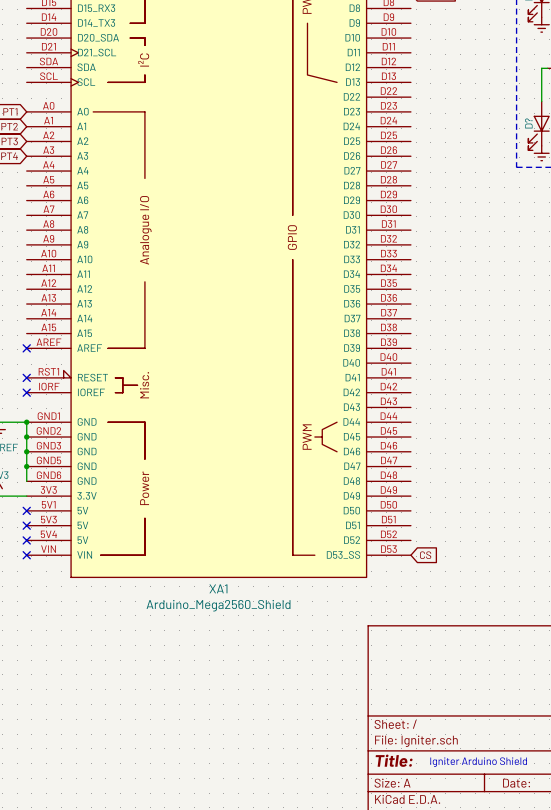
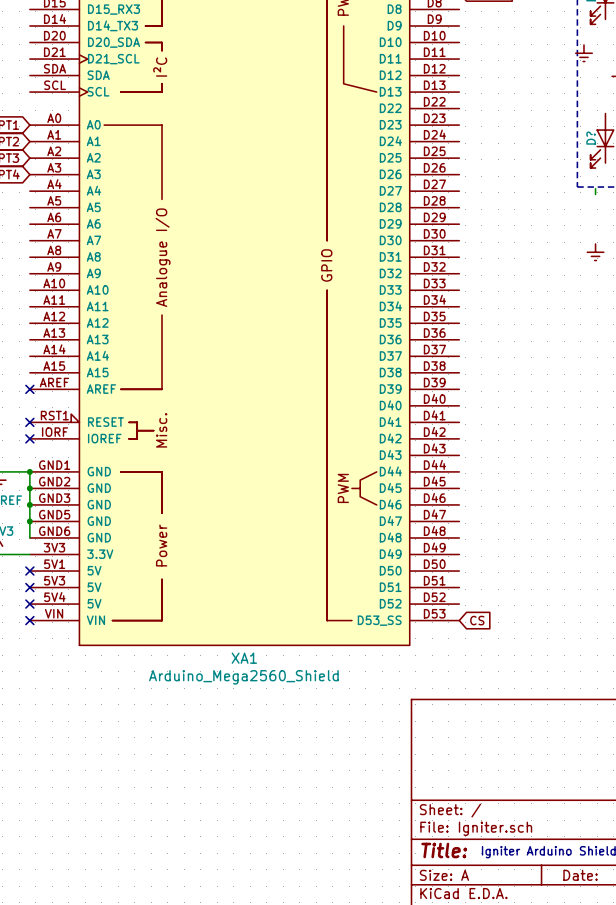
power symbol: (541, 24) -> none
power symbol: none -> (583, 53)
wire: (547, 68) (541, 68) (541, 101) -> none
power symbol: (541, 153) -> none
wire: none -> (595, 188) (595, 194)
power symbol: none -> (595, 252)

